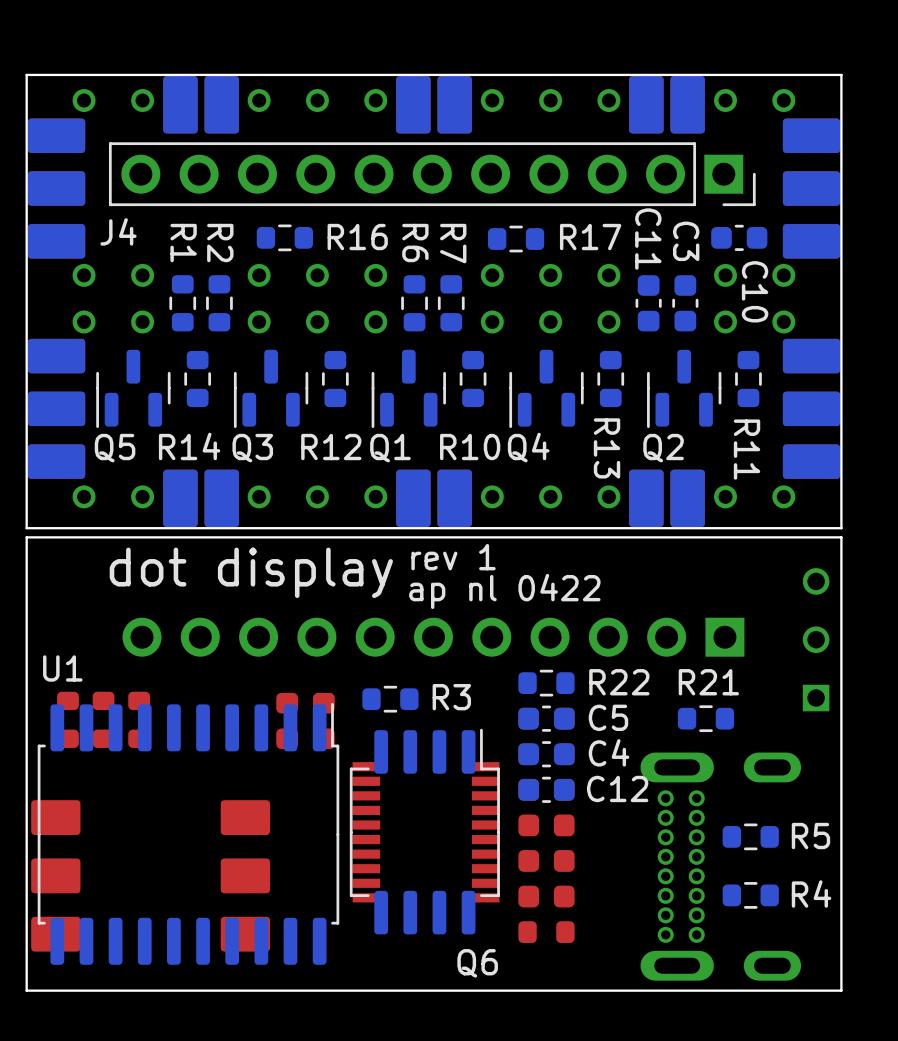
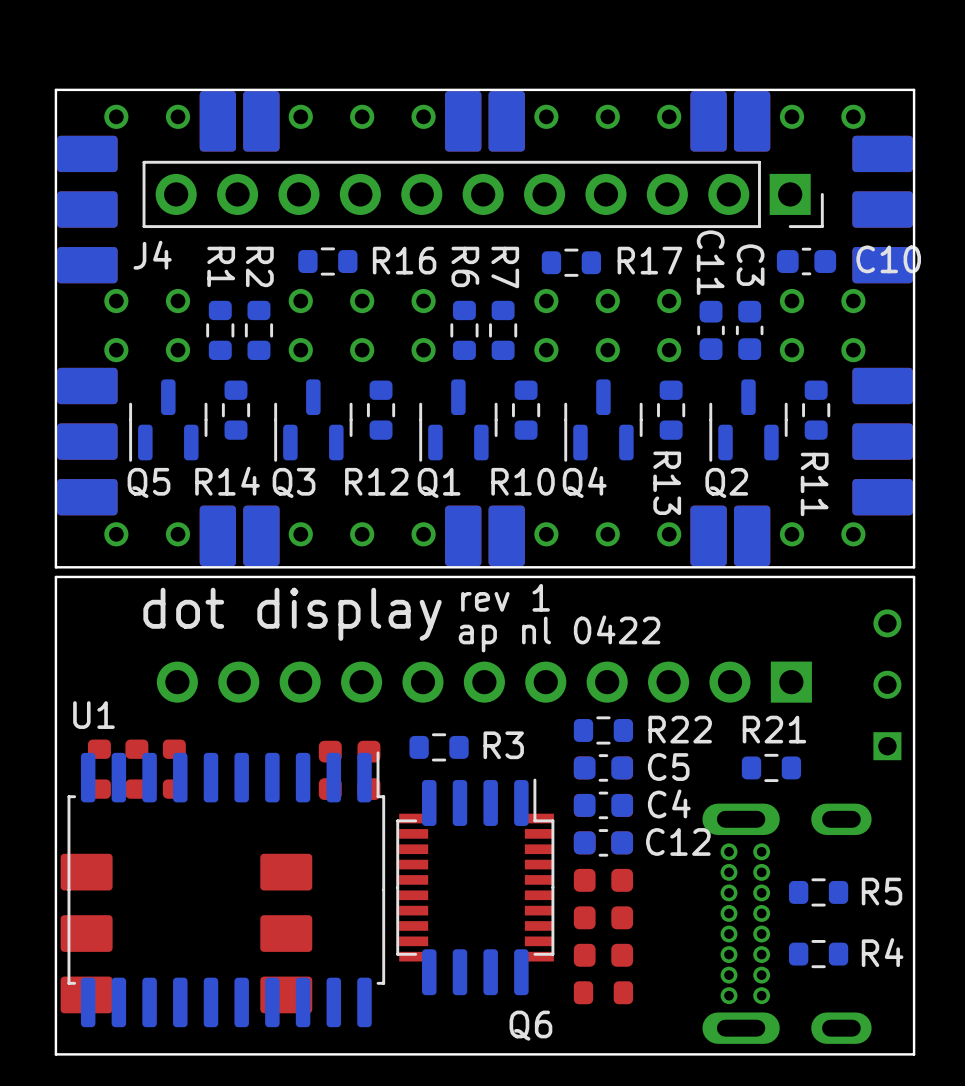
C10 name rotation: 0° (755, 291) -> 90° counterclockwise (888, 259)
C10 name position: C10 (755, 291) -> C10 (888, 259)

